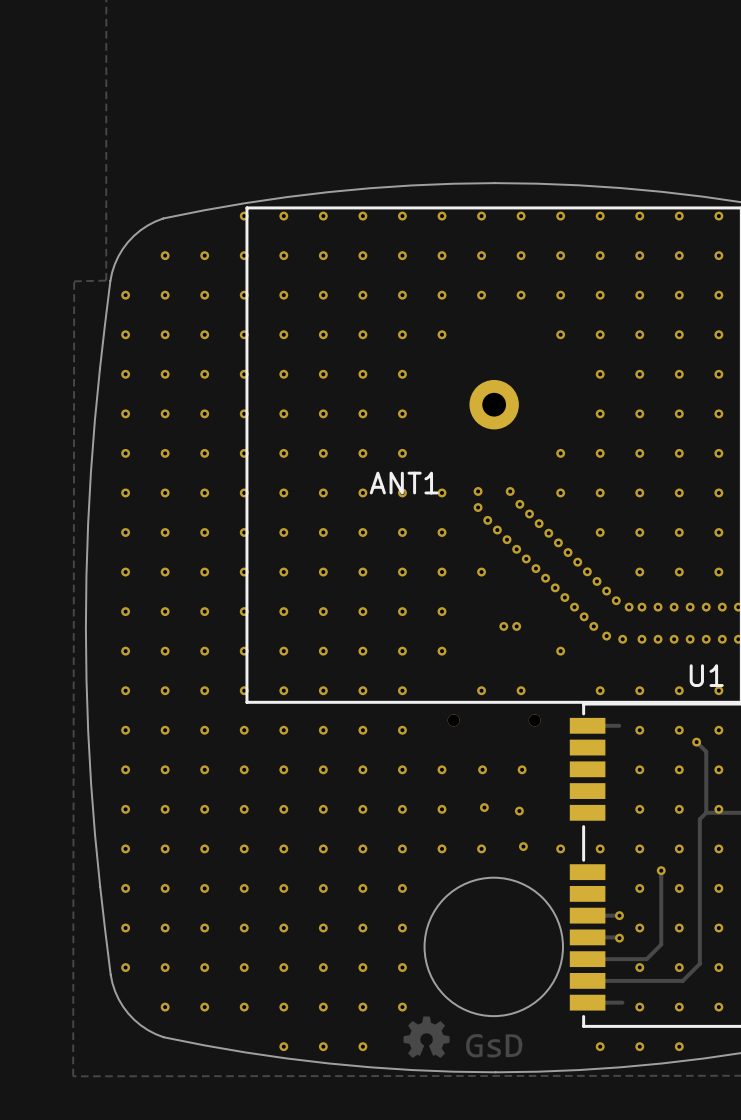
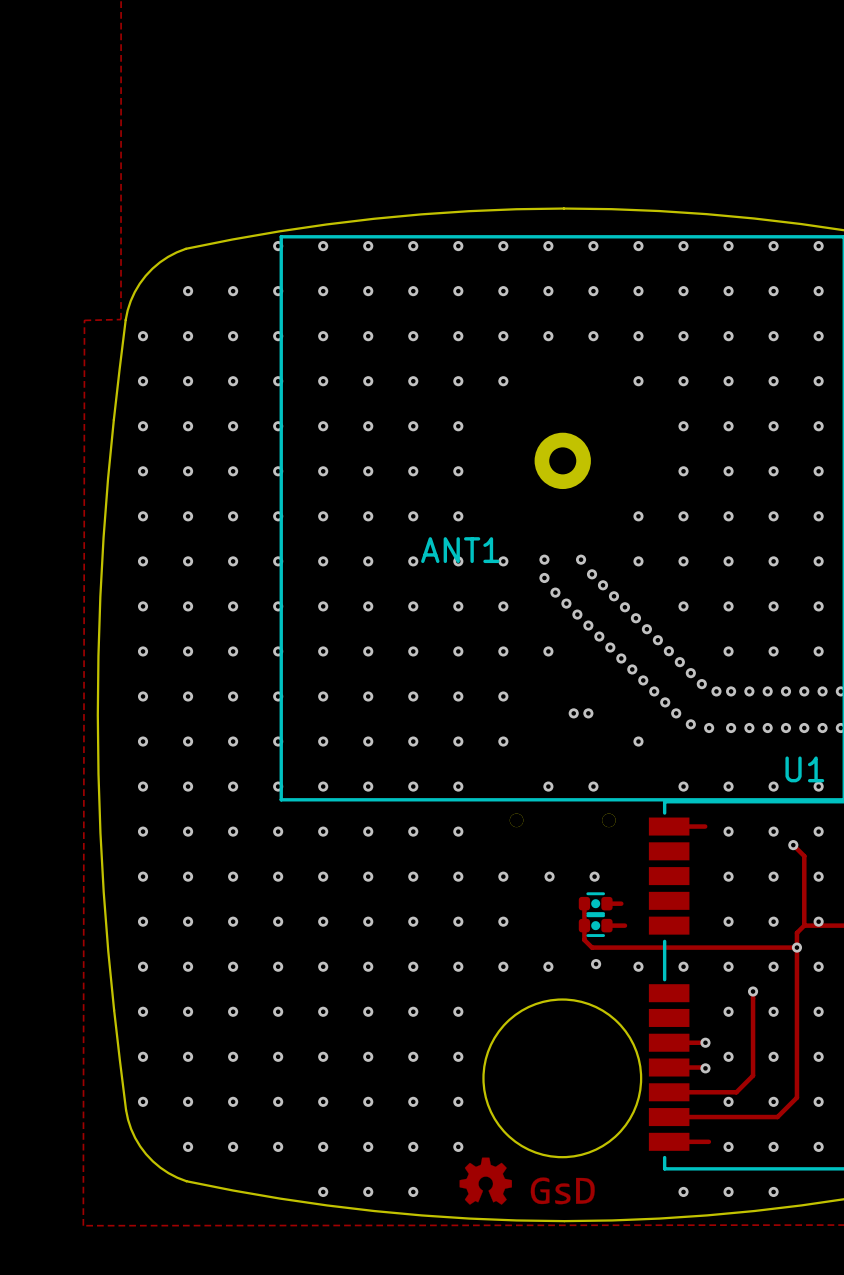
track: none -> (584, 903) (584, 939) (592, 947) (796, 947)
part: none -> (595, 903)
track: none -> (606, 903) (621, 903)
via: (484, 807) -> none
via: (519, 811) -> none
part: none -> (595, 925)
track: none -> (606, 925) (624, 925)
via: none -> (796, 947)

